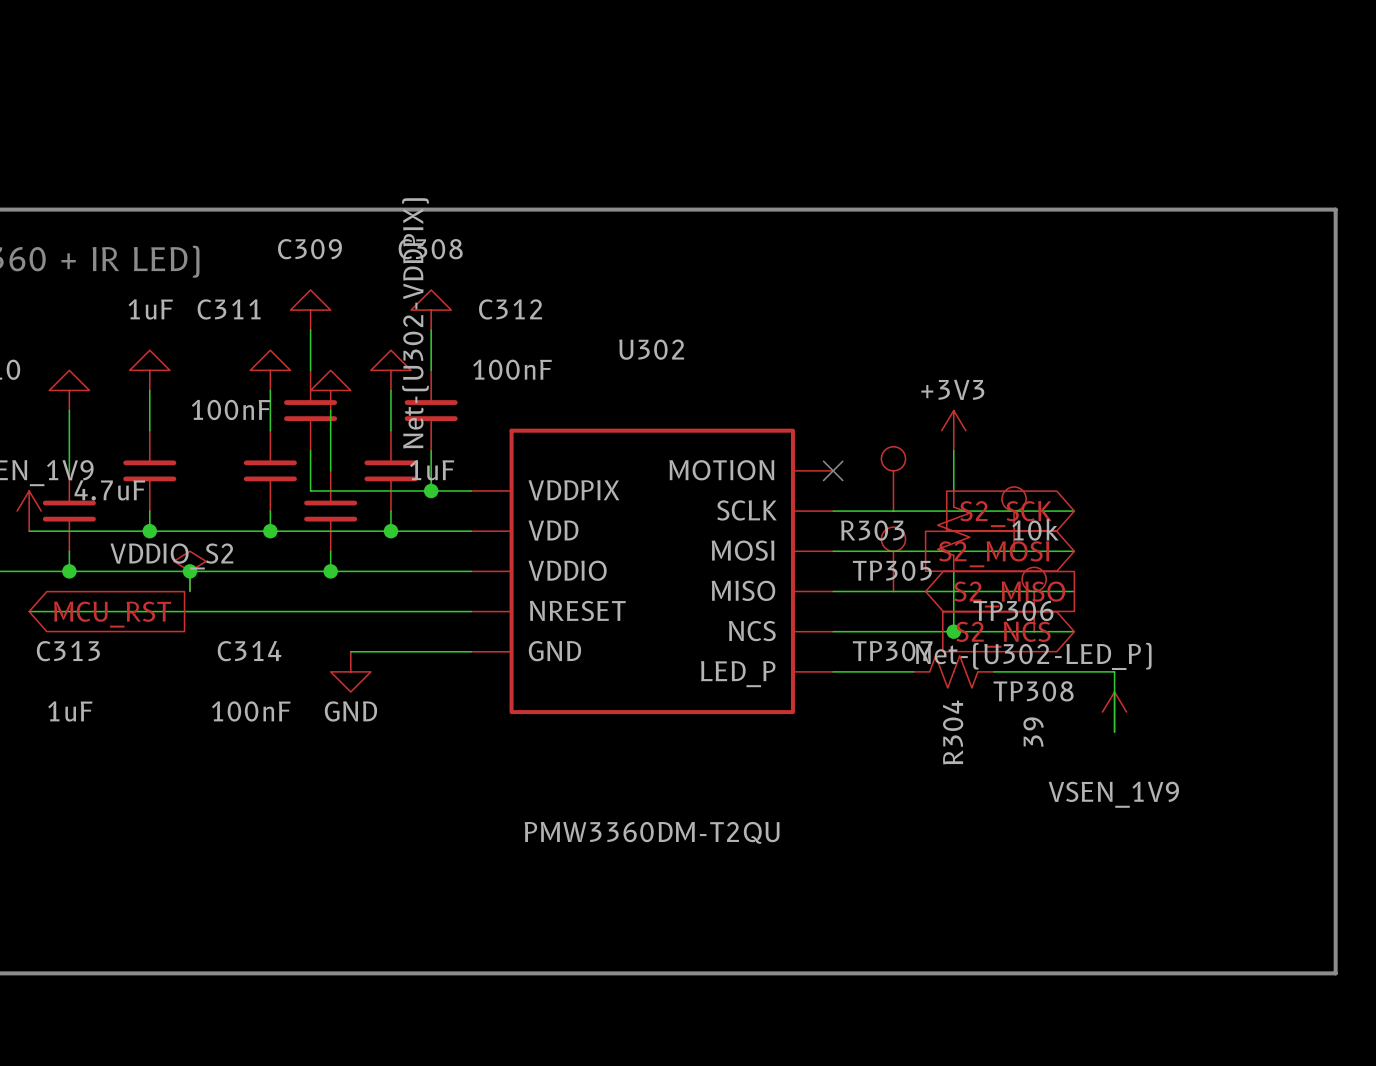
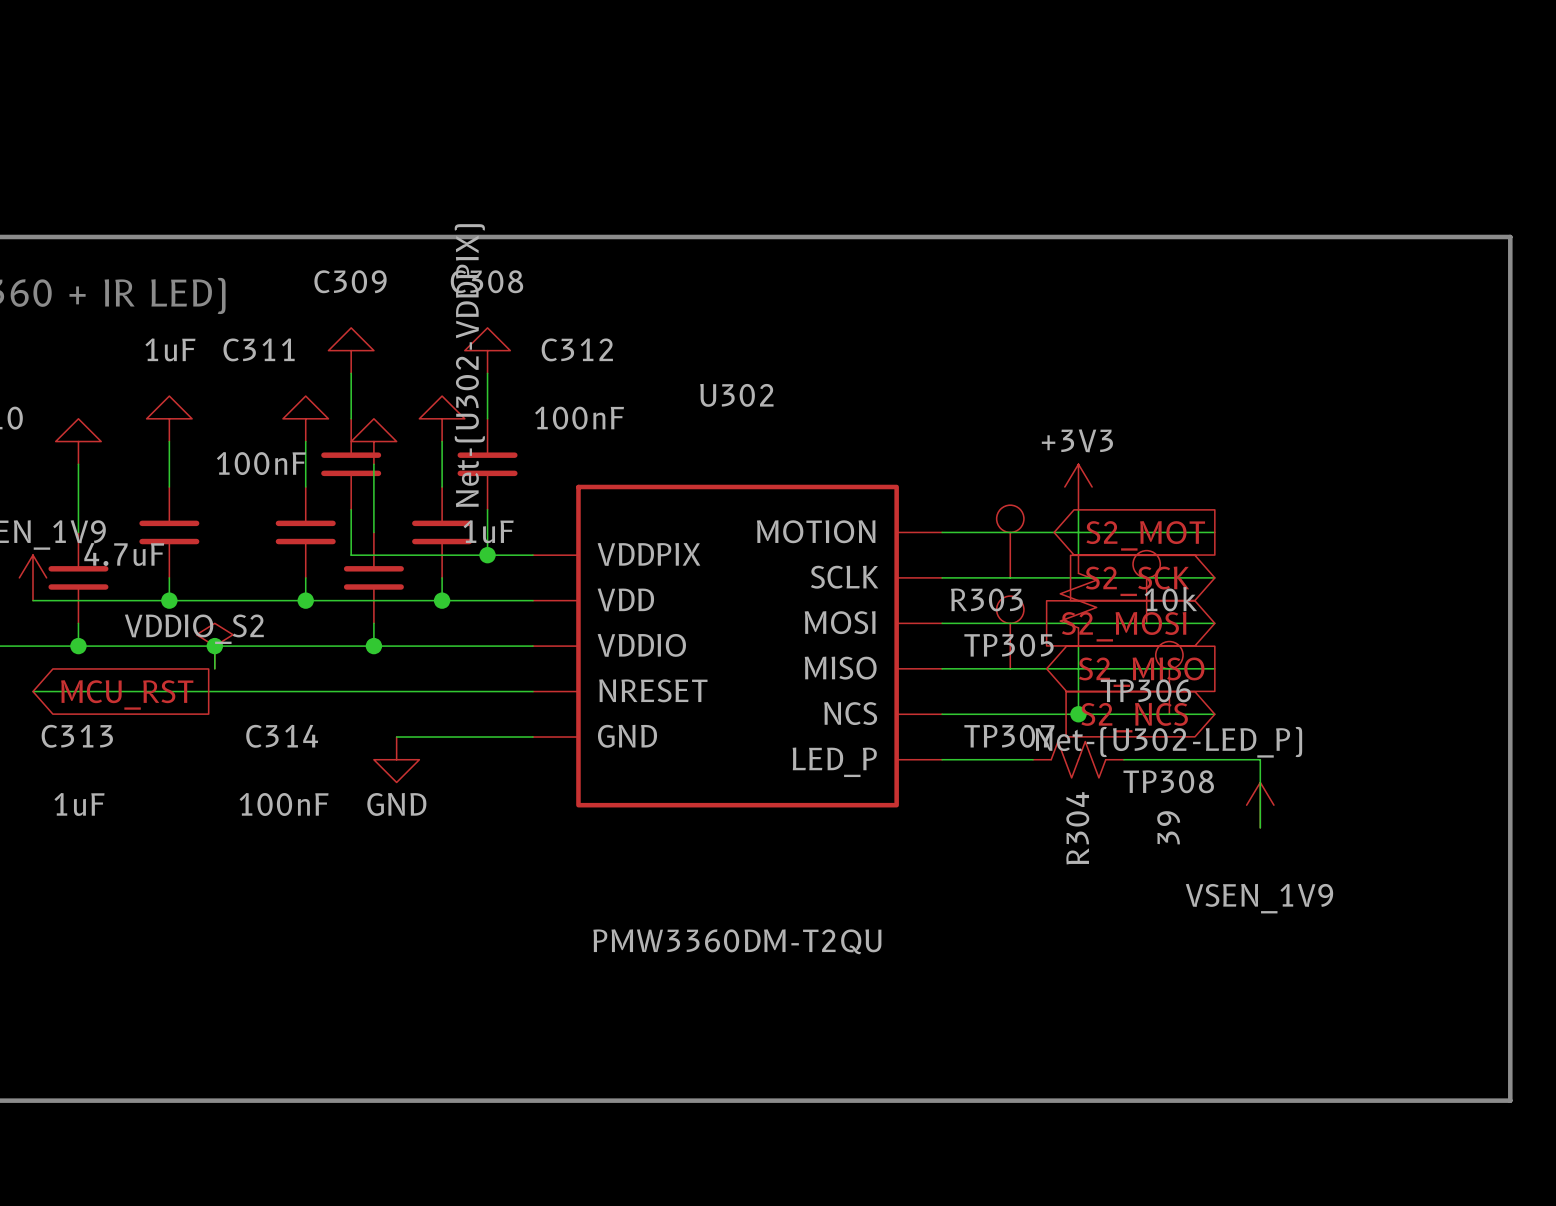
wire: none -> (942, 532) (1214, 532)
no-connect mark: (833, 470) -> none
global label: none -> S2_MOT (1145, 535)

